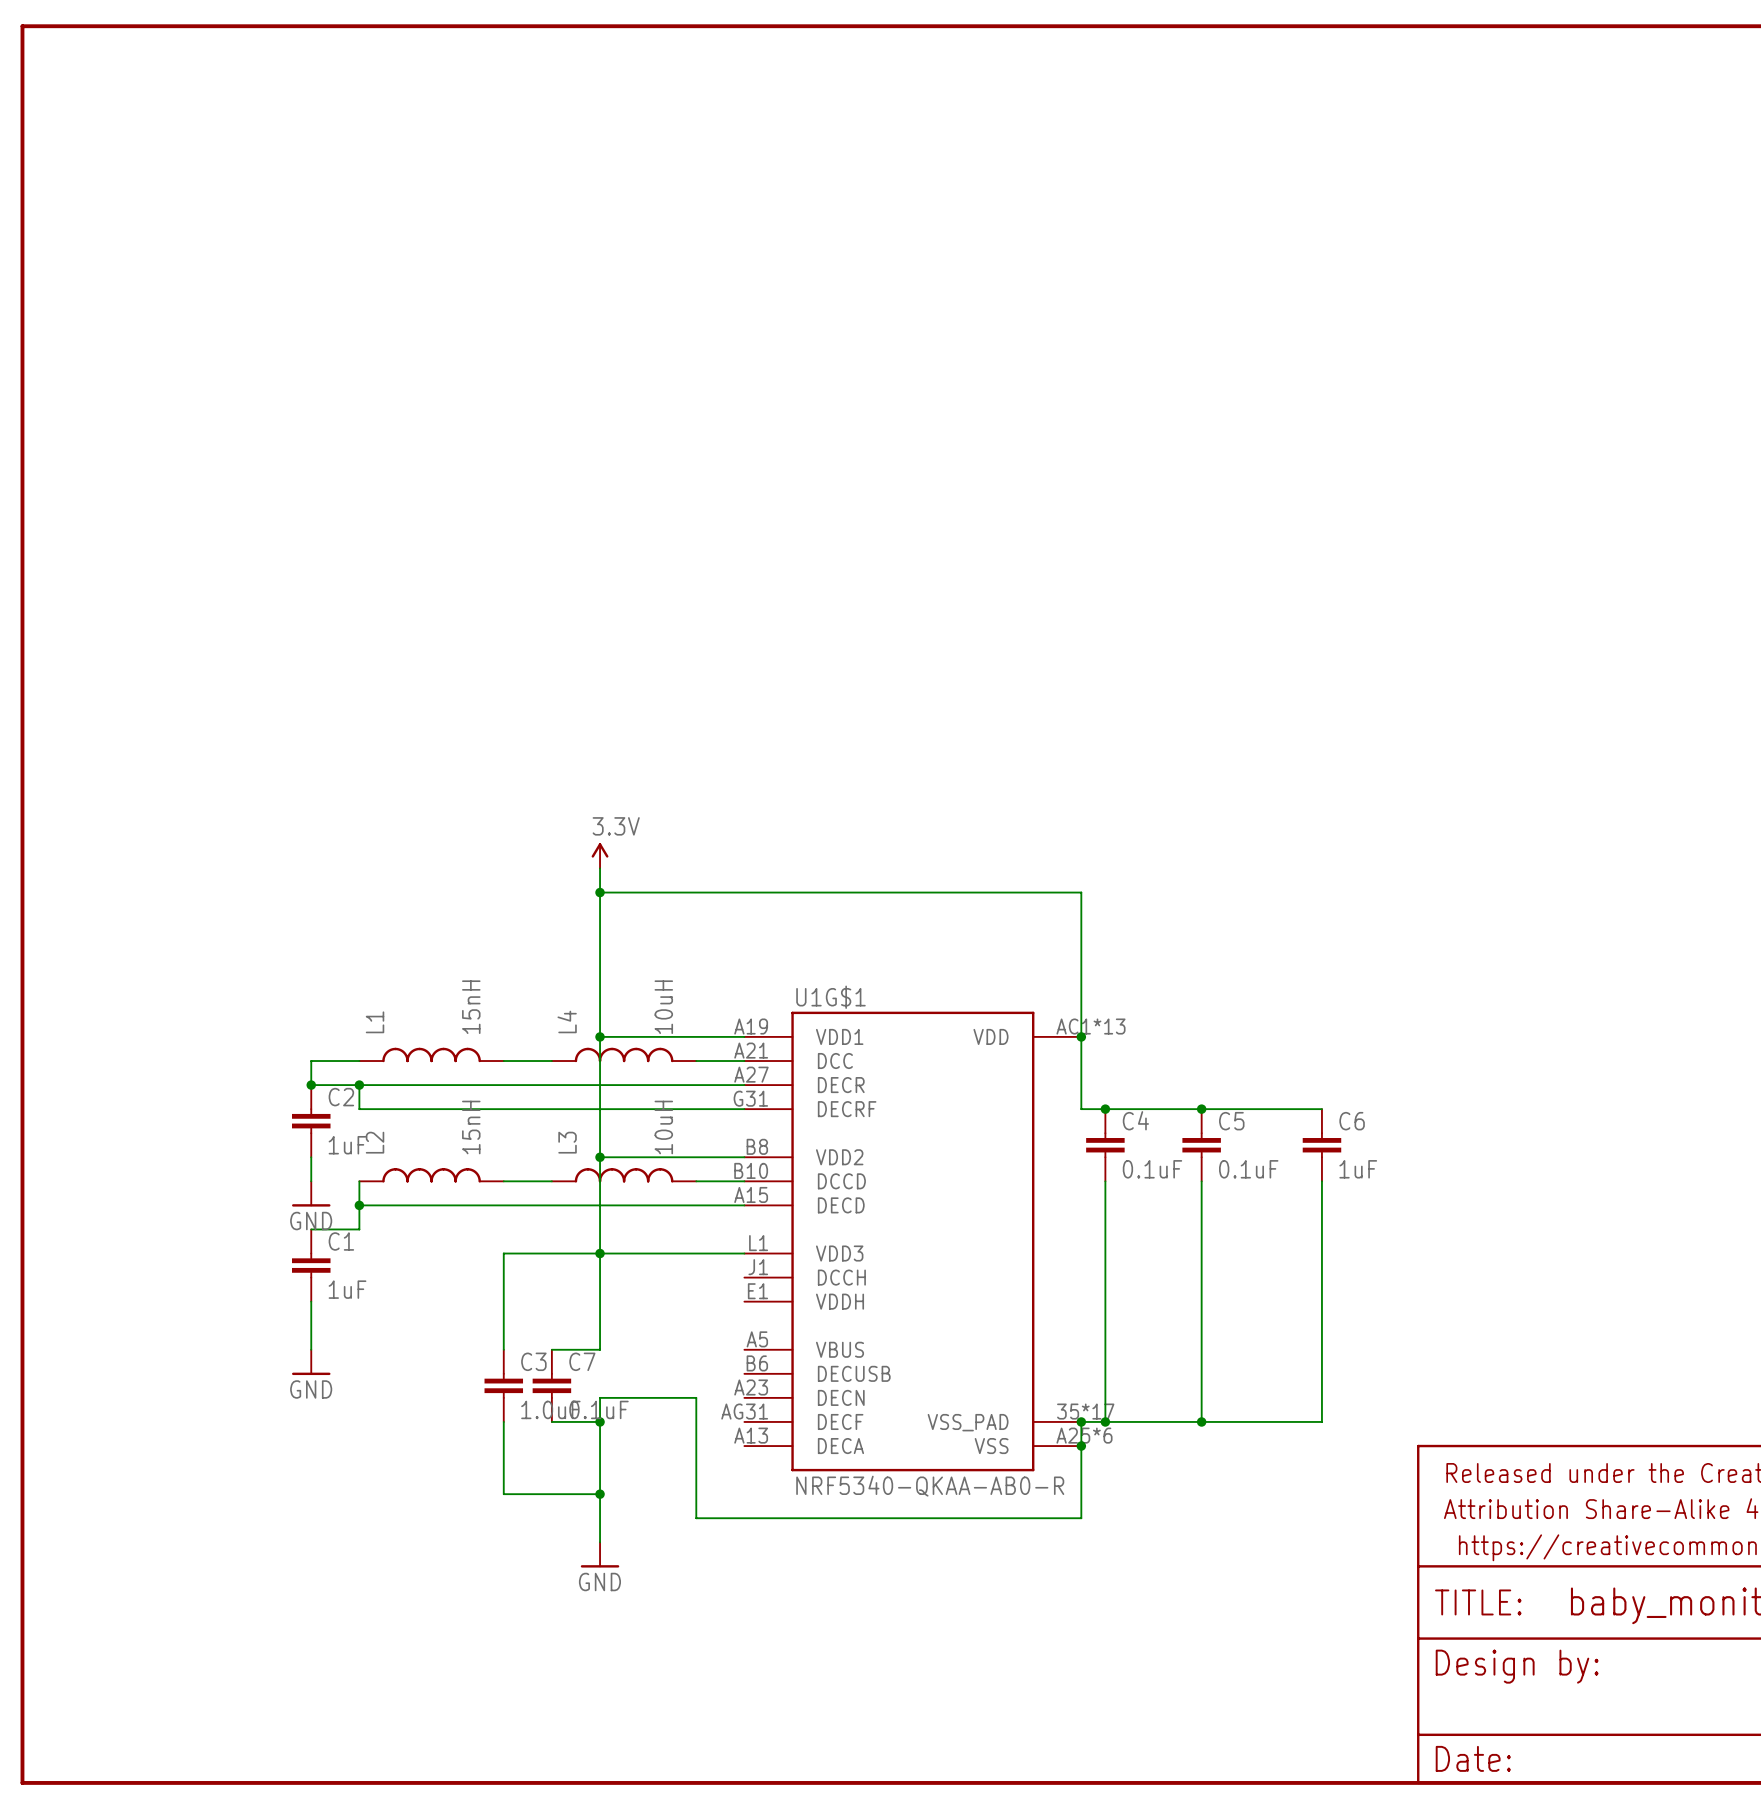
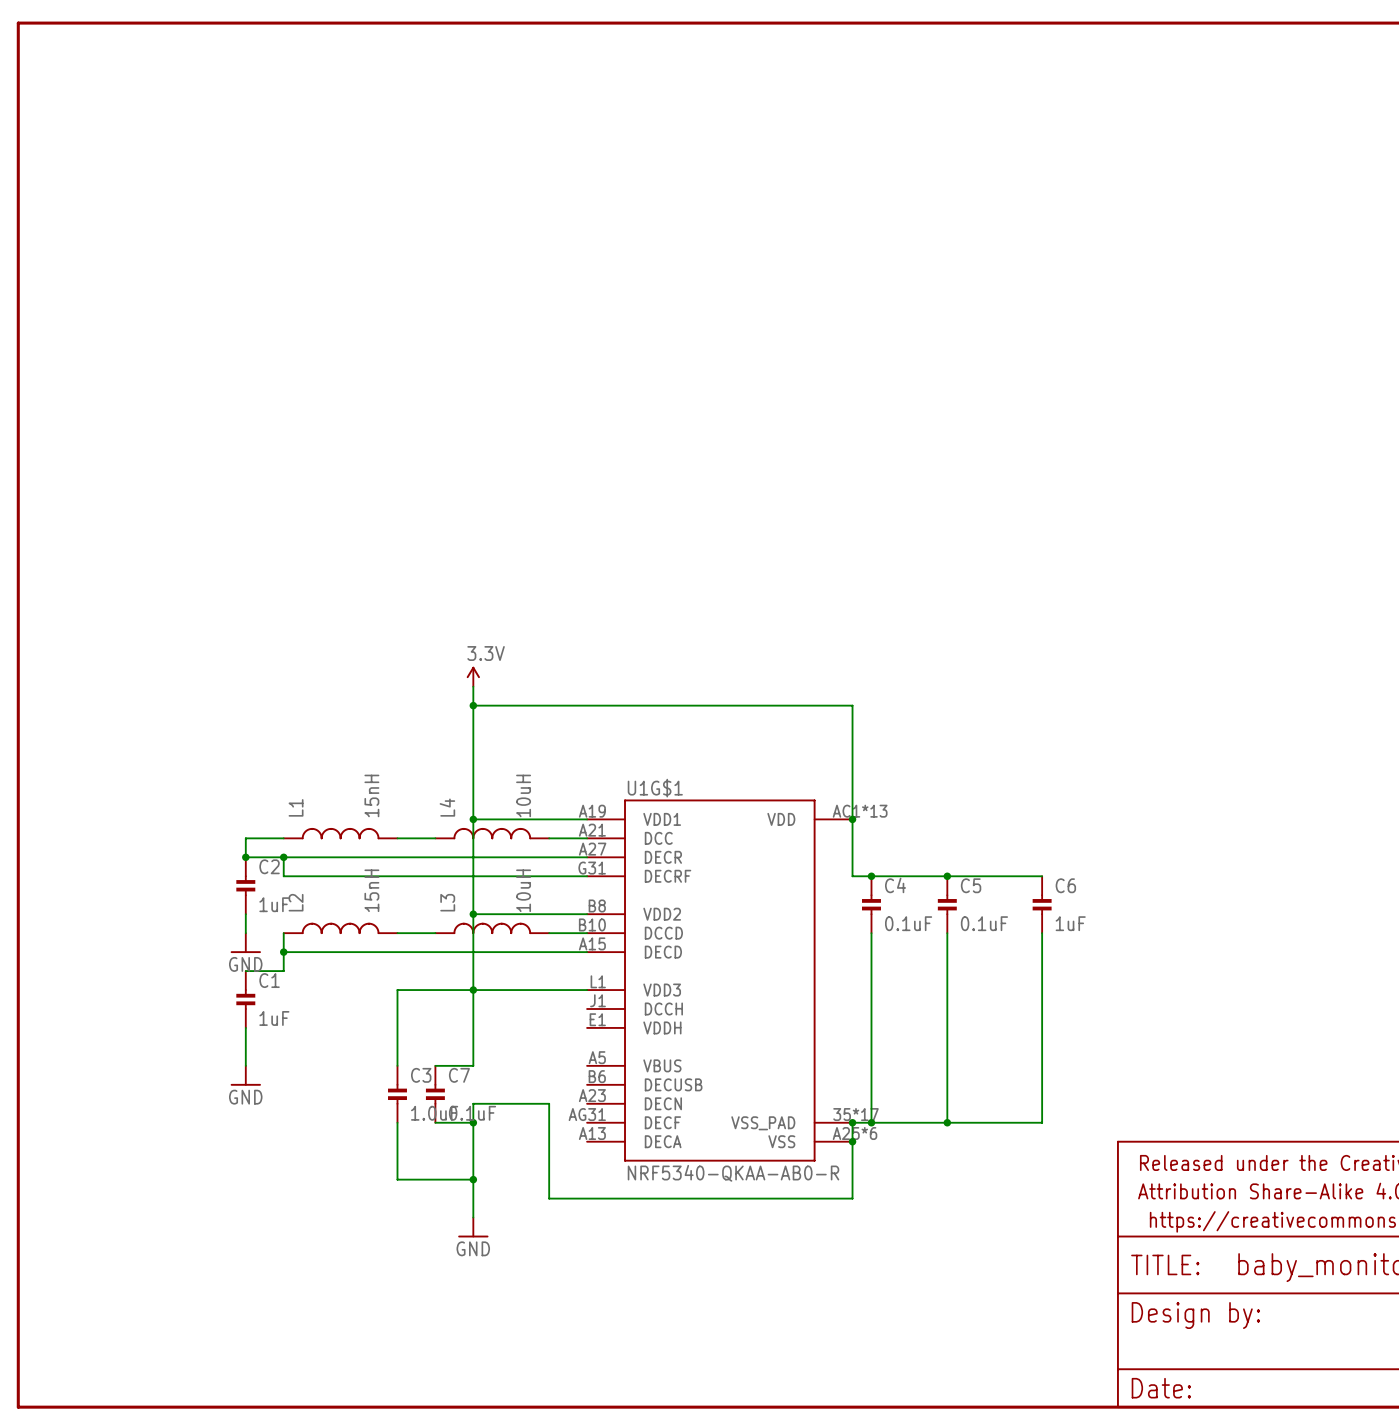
C2 symbol: [292, 1085, 331, 1158] -> [236, 857, 256, 915]
C4 symbol: [1086, 1109, 1125, 1182] -> [862, 876, 881, 934]
C5 symbol: [1182, 1109, 1221, 1182] -> [937, 876, 957, 934]
C6 symbol: [1302, 1109, 1342, 1182] -> [1032, 876, 1052, 934]
C1 symbol: [292, 1229, 331, 1302] -> [236, 971, 256, 1028]
C3 symbol: [484, 1349, 524, 1422] -> [388, 1065, 407, 1123]
C7 symbol: [532, 1349, 572, 1422] -> [425, 1065, 445, 1123]

